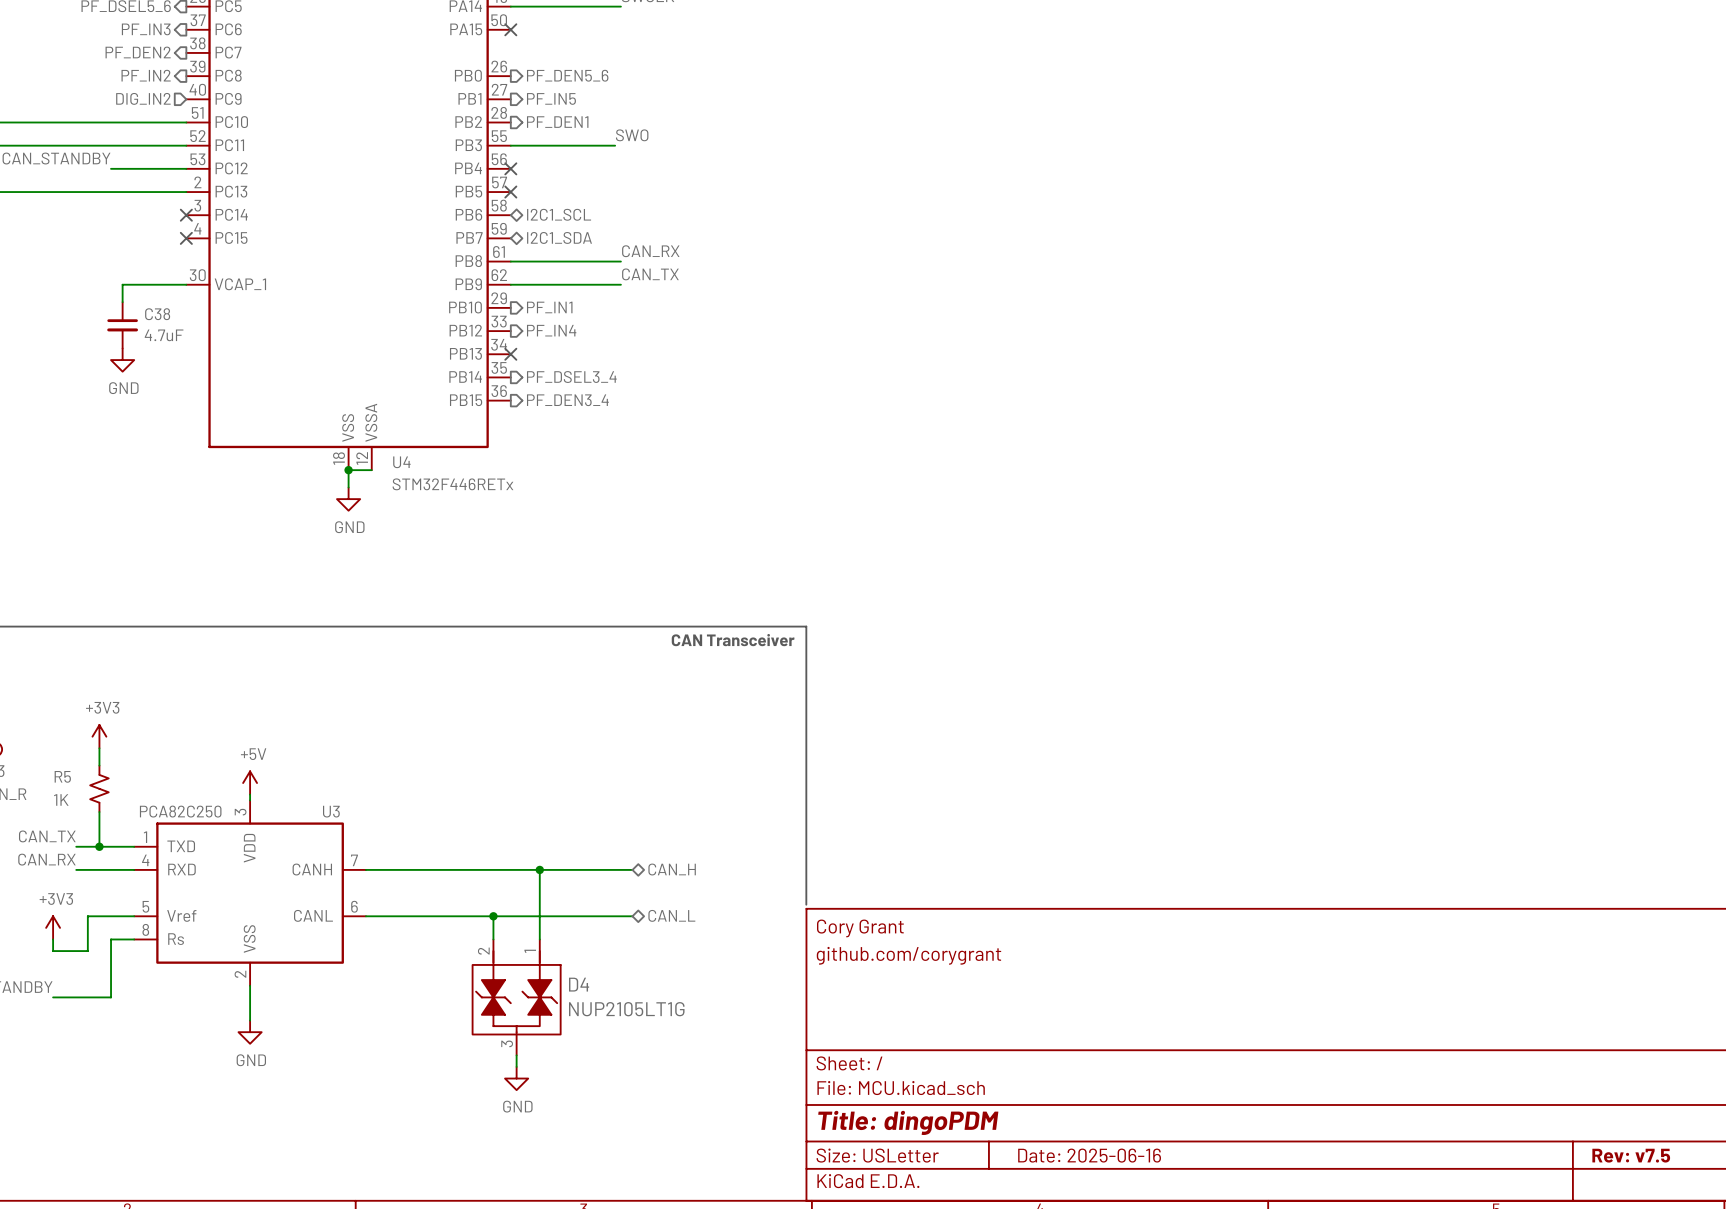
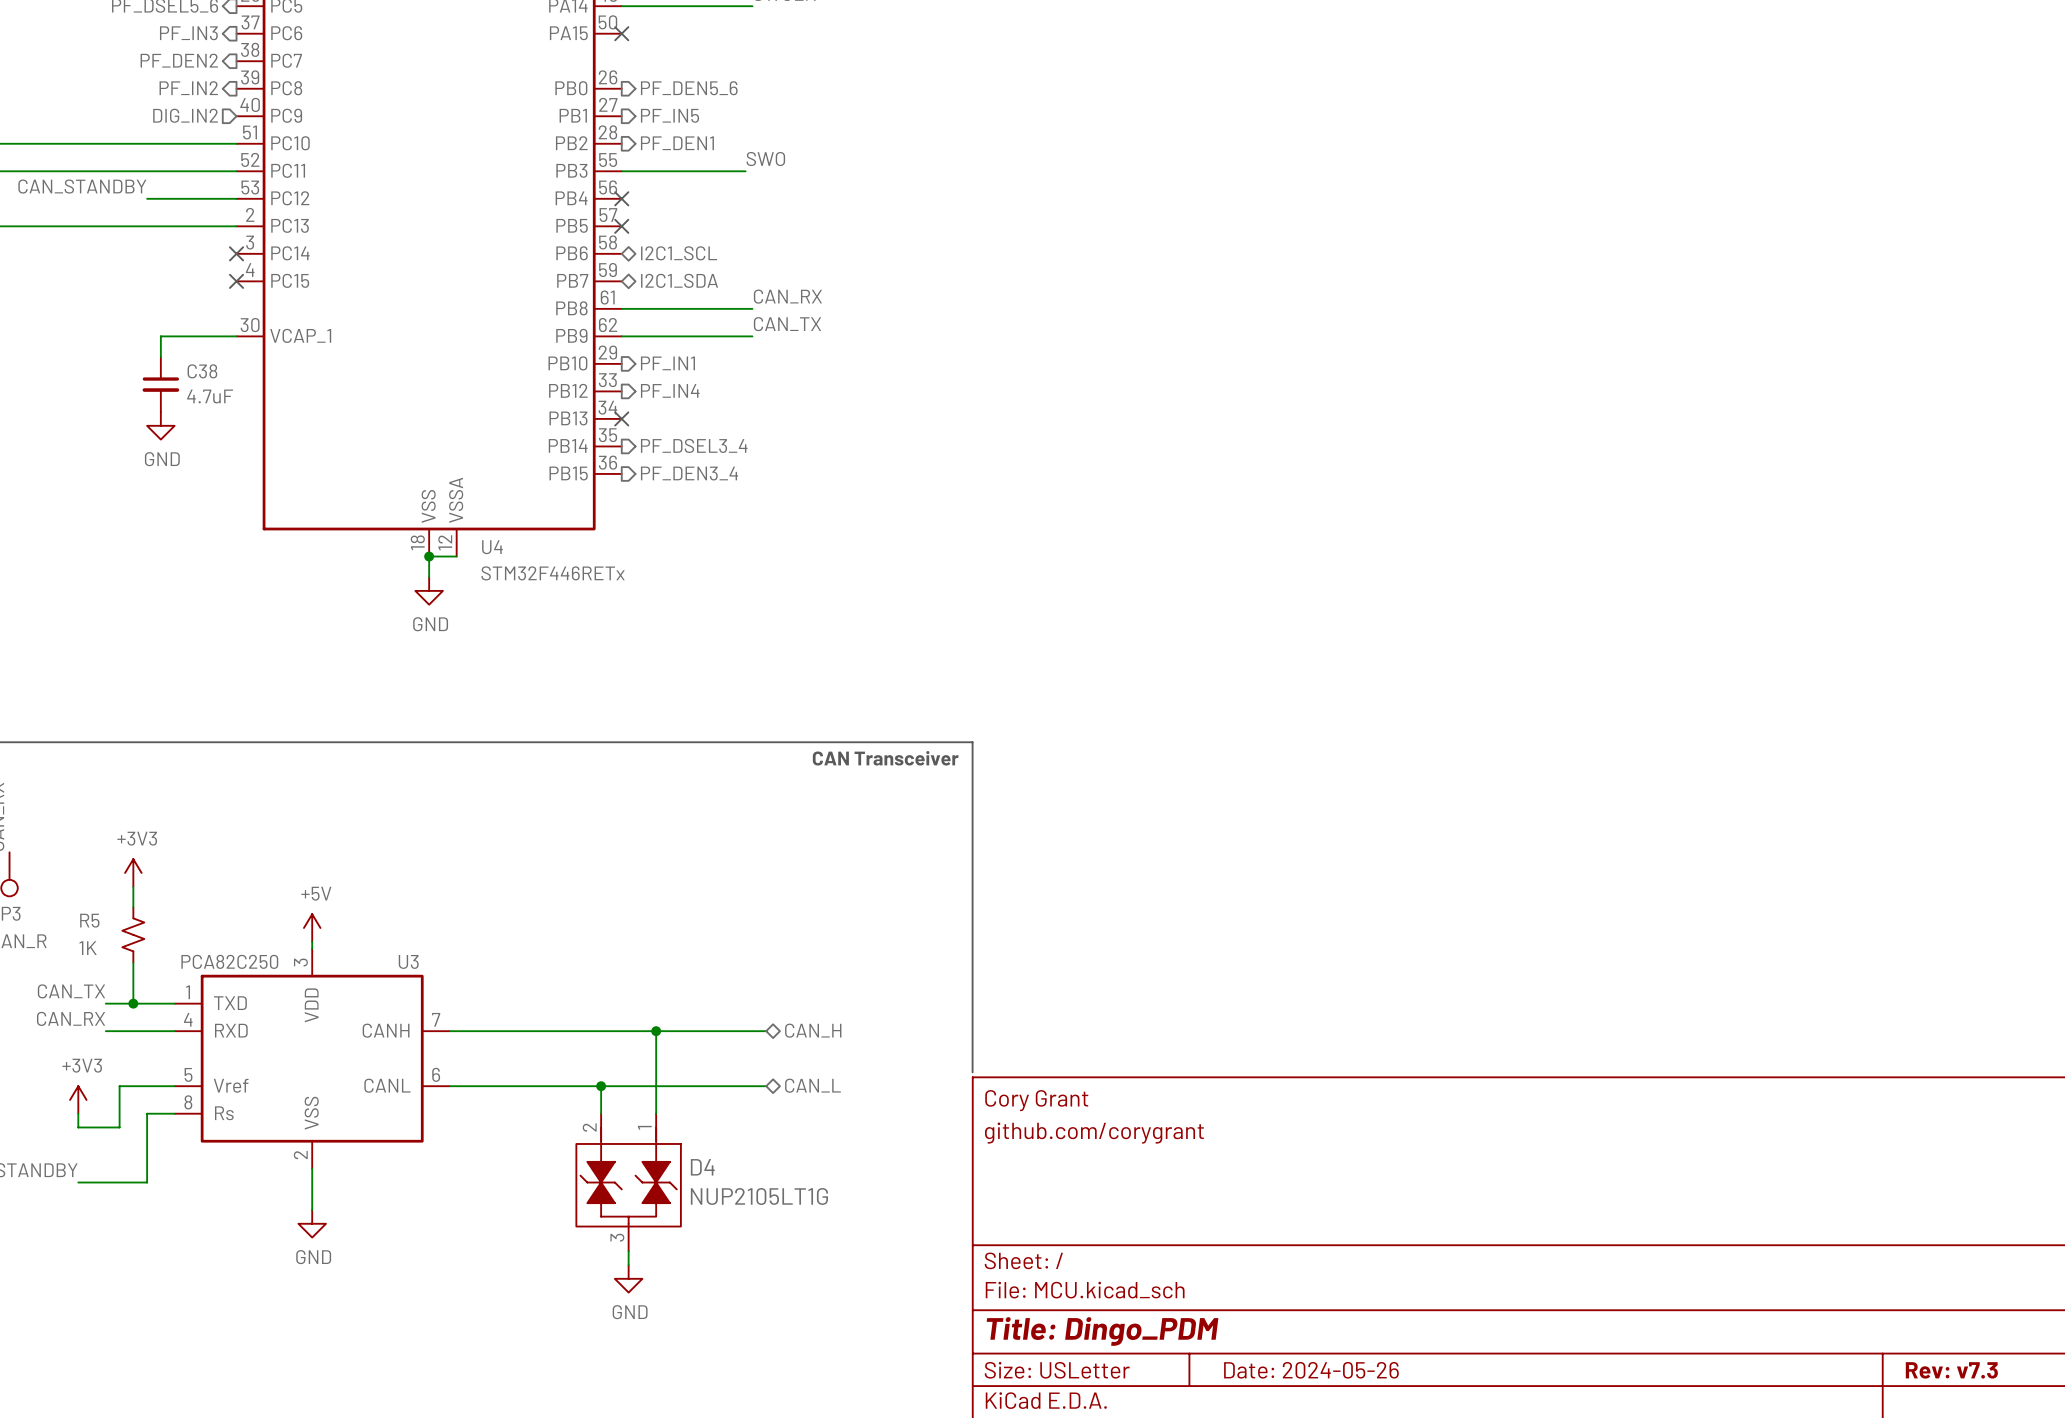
title block: Title: dingoPDM (908, 1122) -> Title: Dingo_PDM (1102, 1331)
title block: Date: 2025-06-16 (1089, 1155) -> Date: 2024-05-26 (1311, 1370)
title block: Rev: v7.5 (1631, 1155) -> Rev: v7.3 (1951, 1370)

